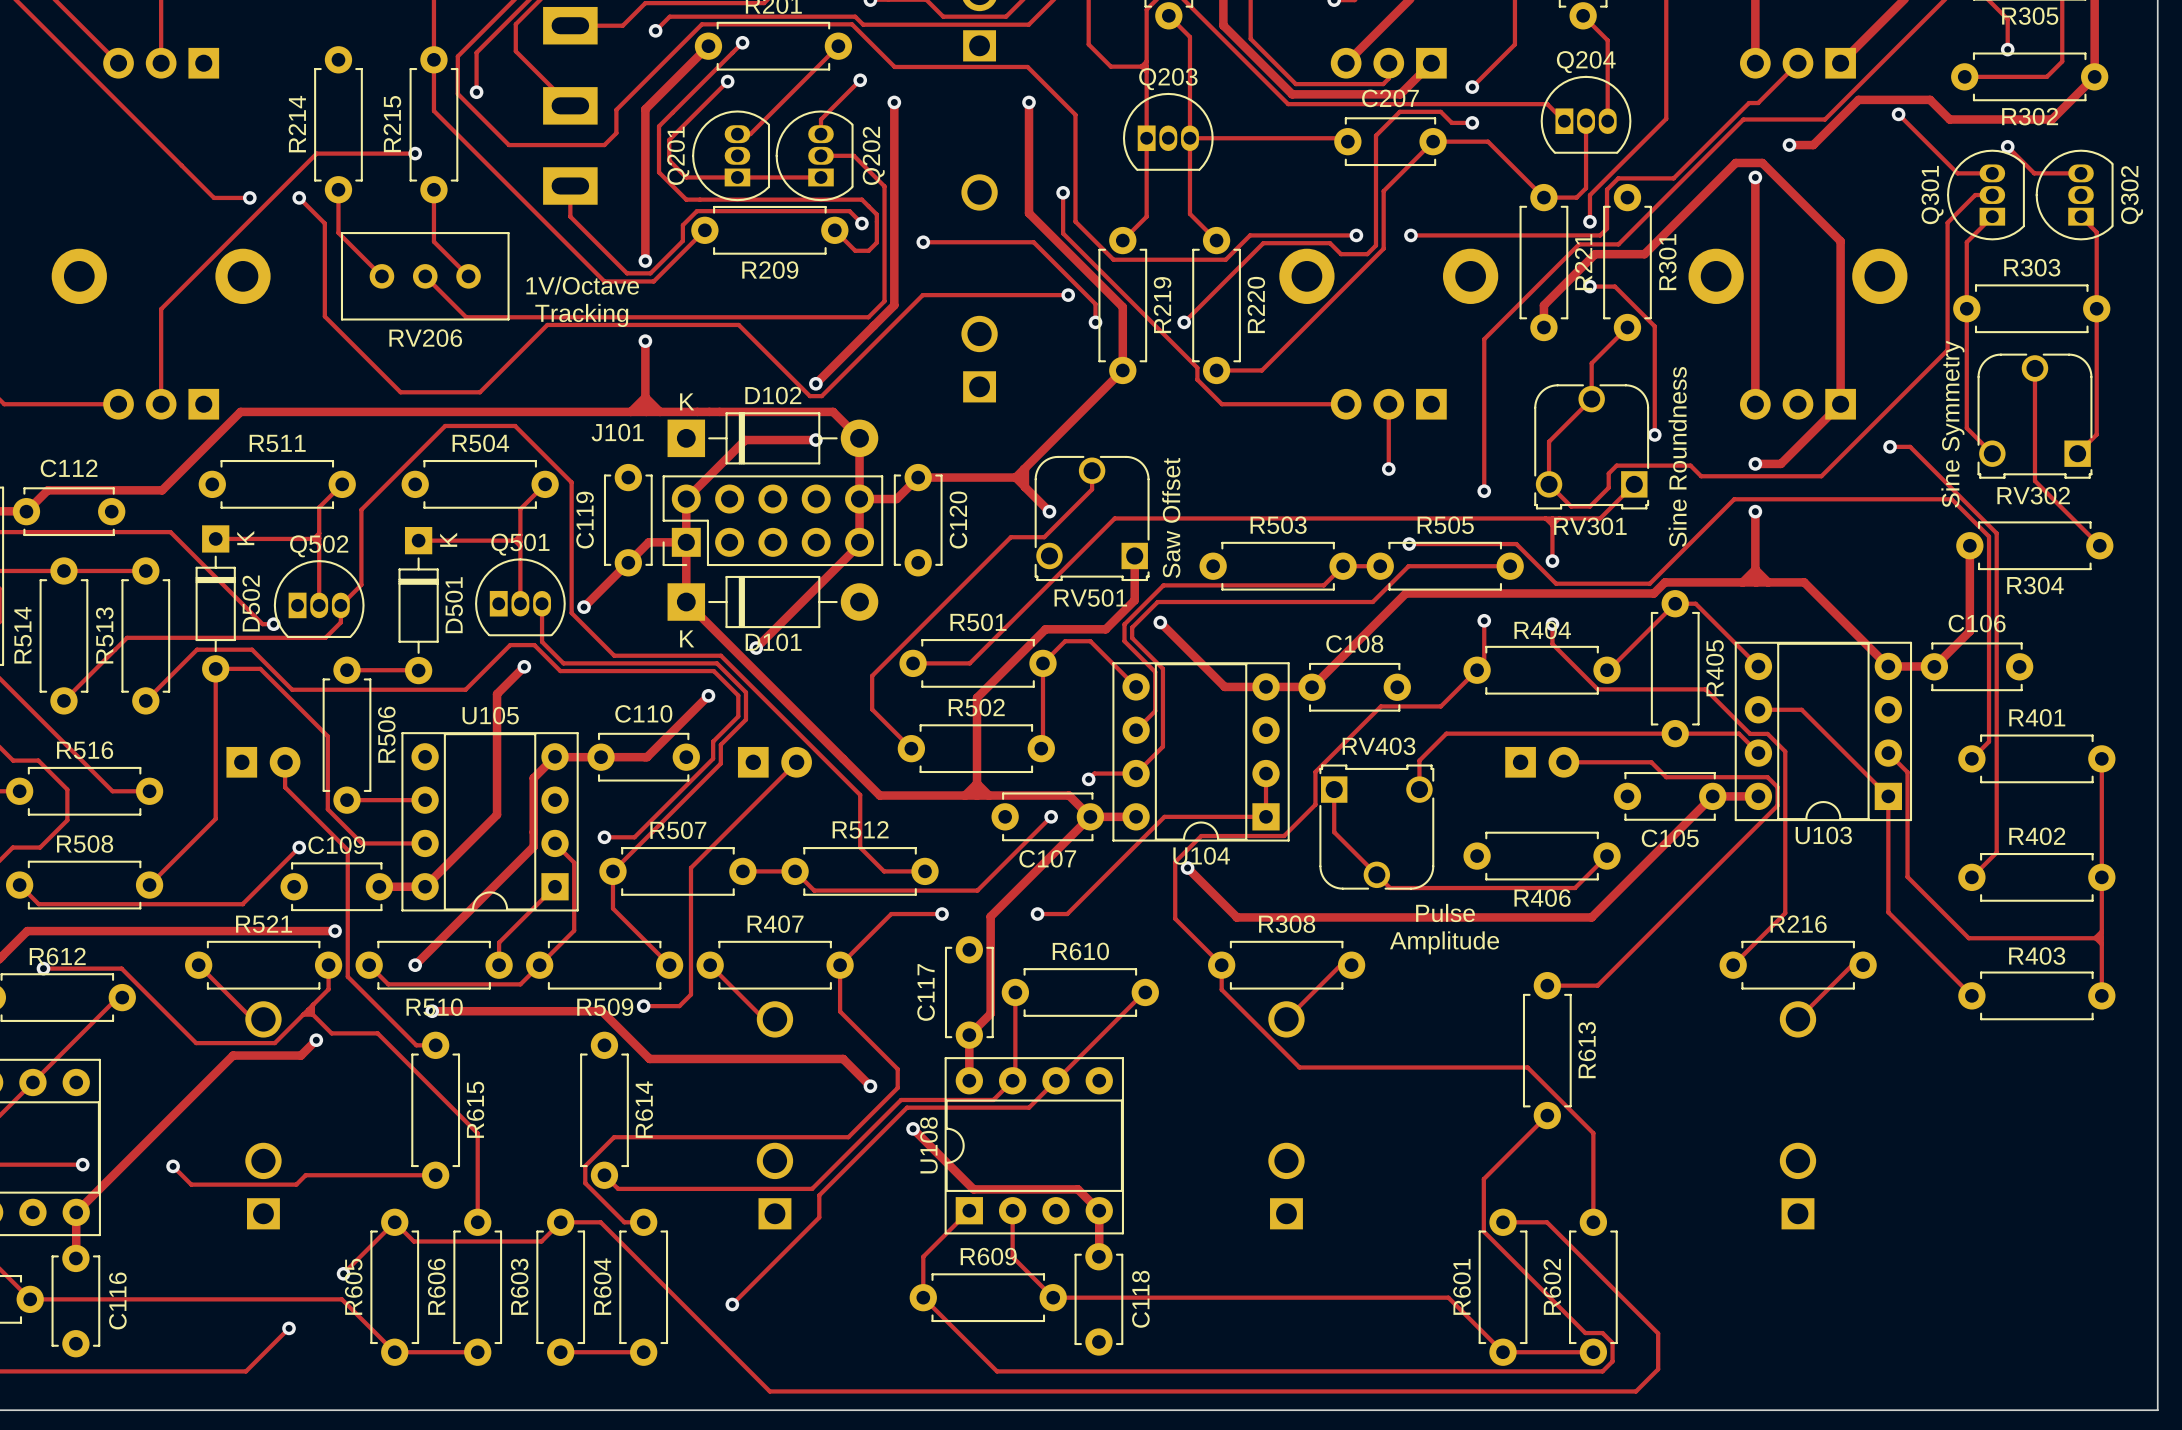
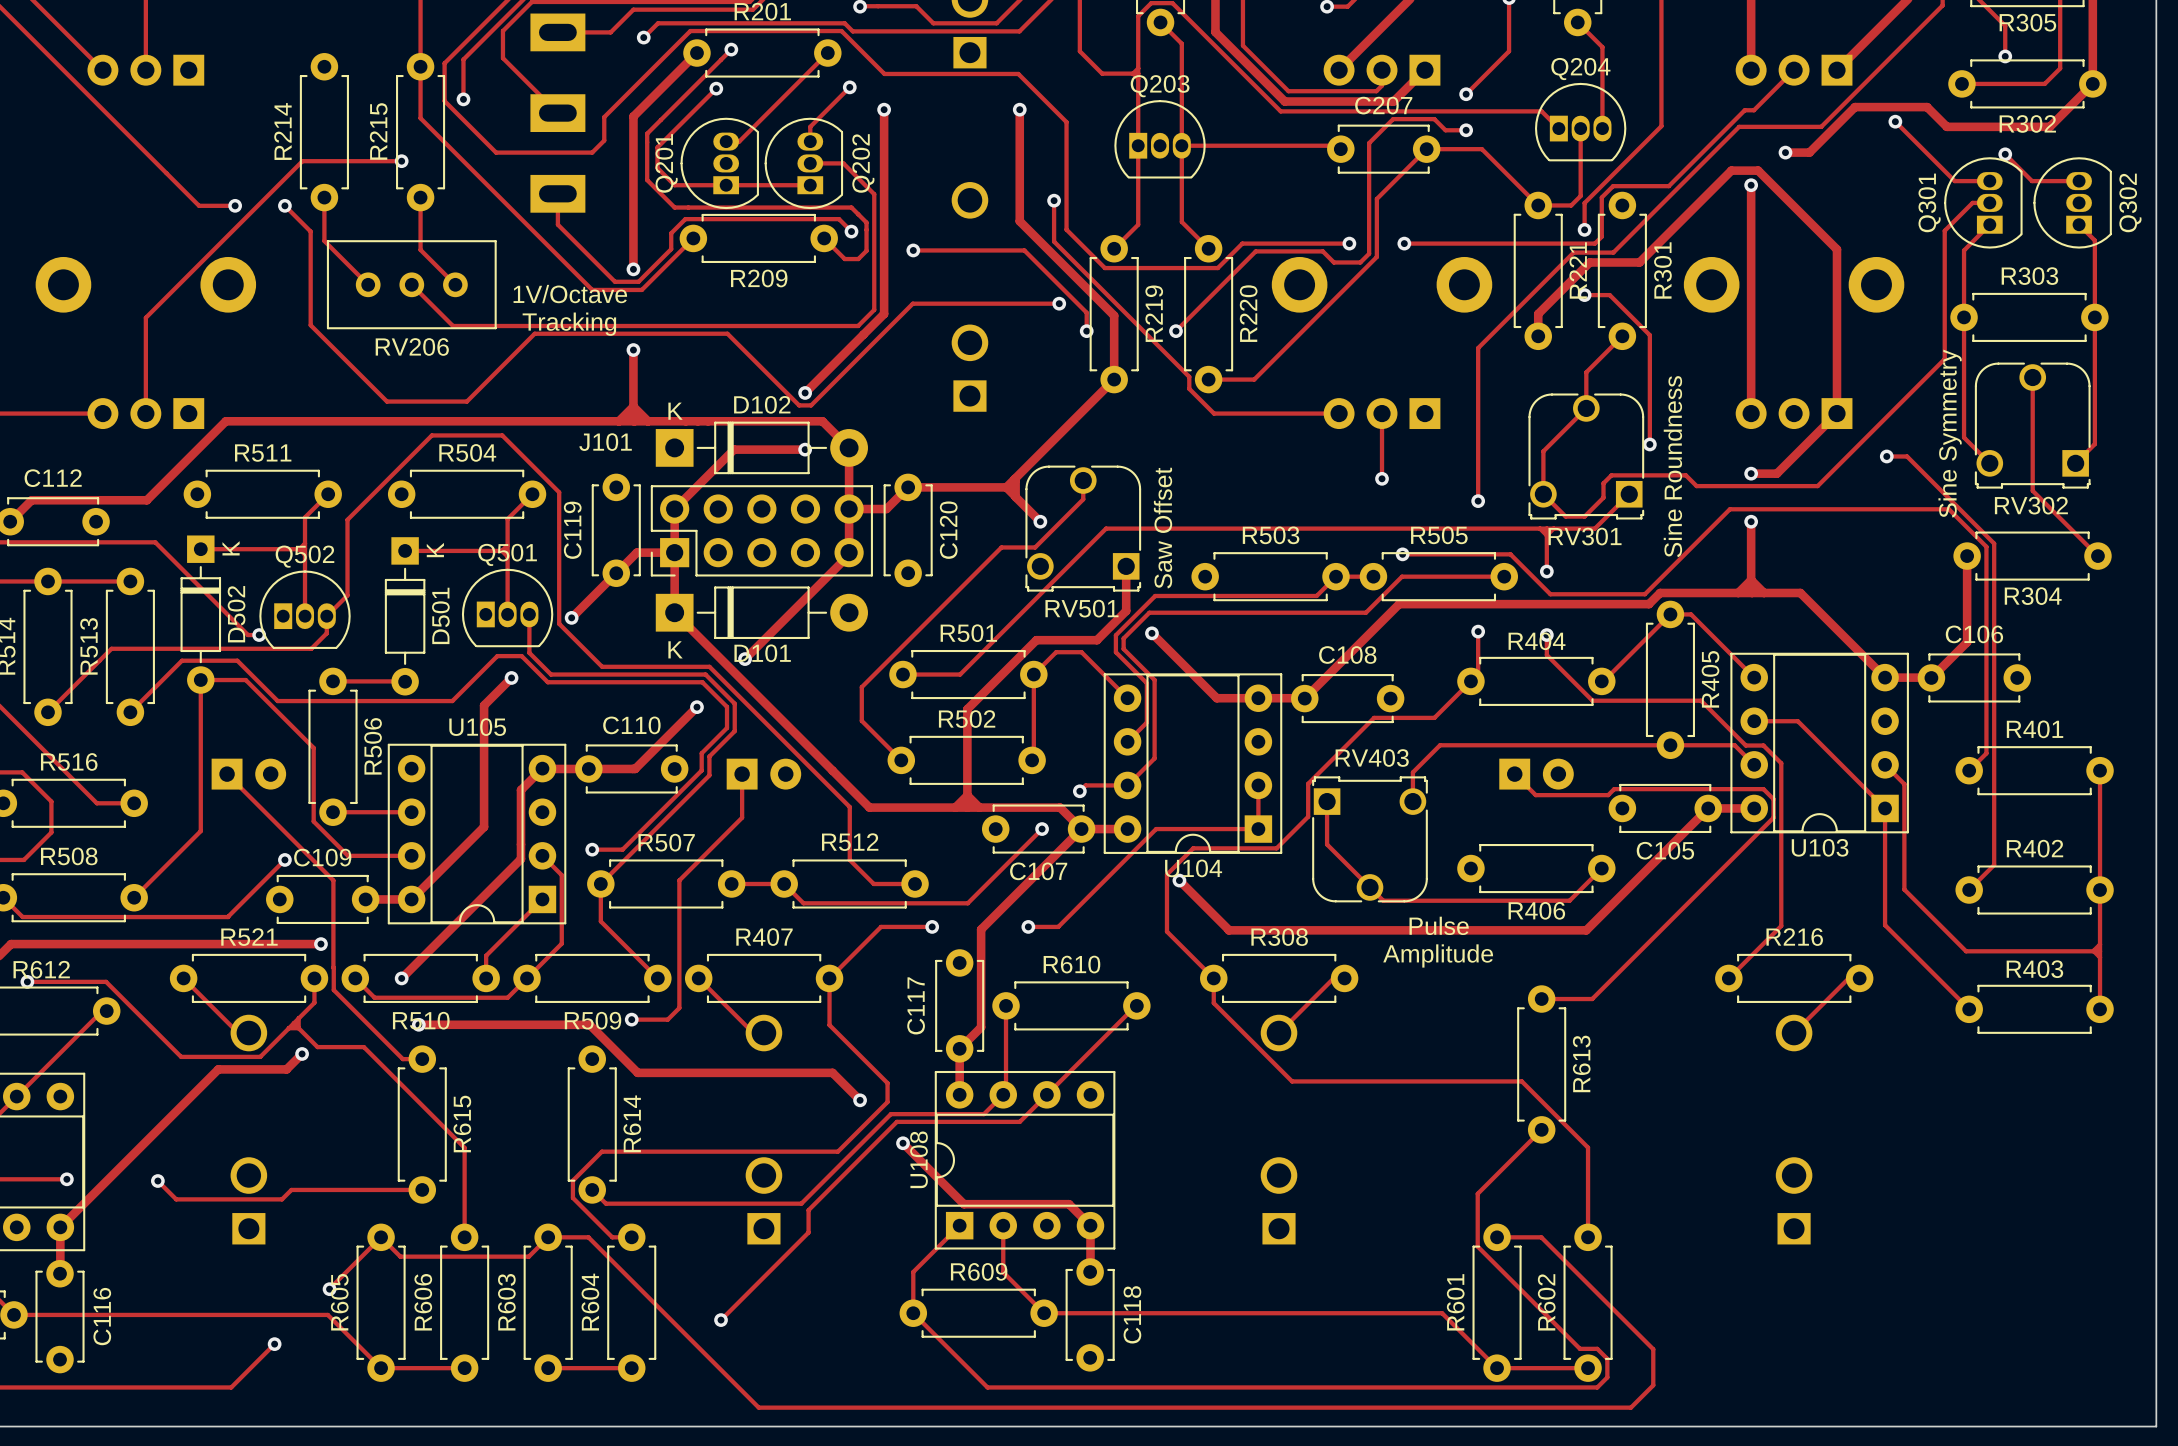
track: (285, 762) (285, 787) (347, 850) (347, 954) -> (227, 774) (333, 880) (333, 968)
track: (796, 762) (753, 805) -> (742, 774) (742, 817)
track: (1563, 762) (1651, 762) (1666, 777) -> (1514, 774) (1535, 795) (1608, 795) (1614, 789) (1661, 789)

